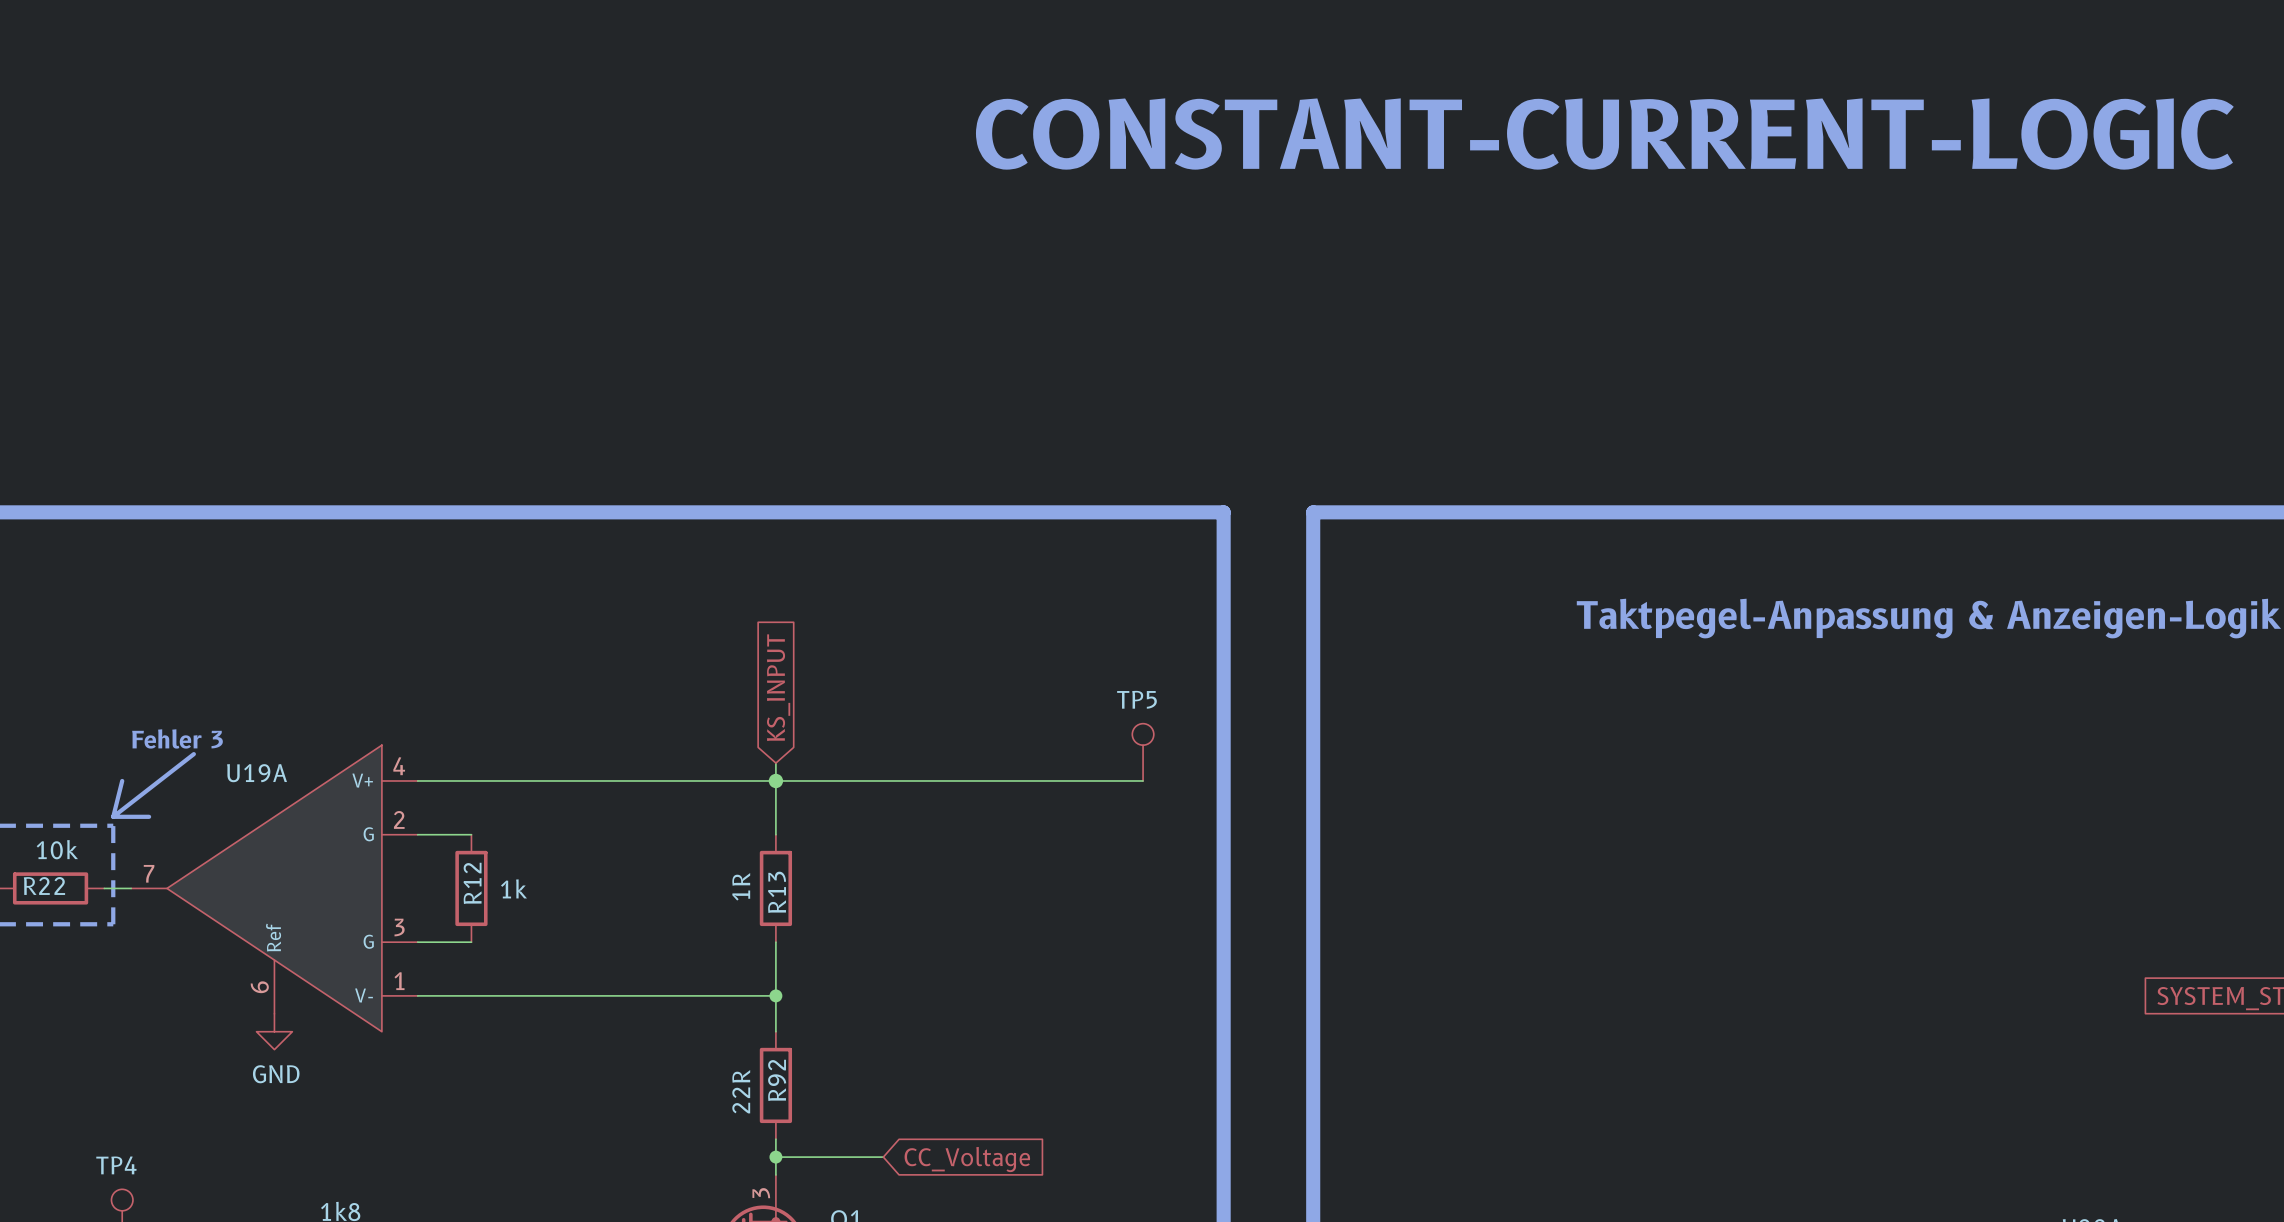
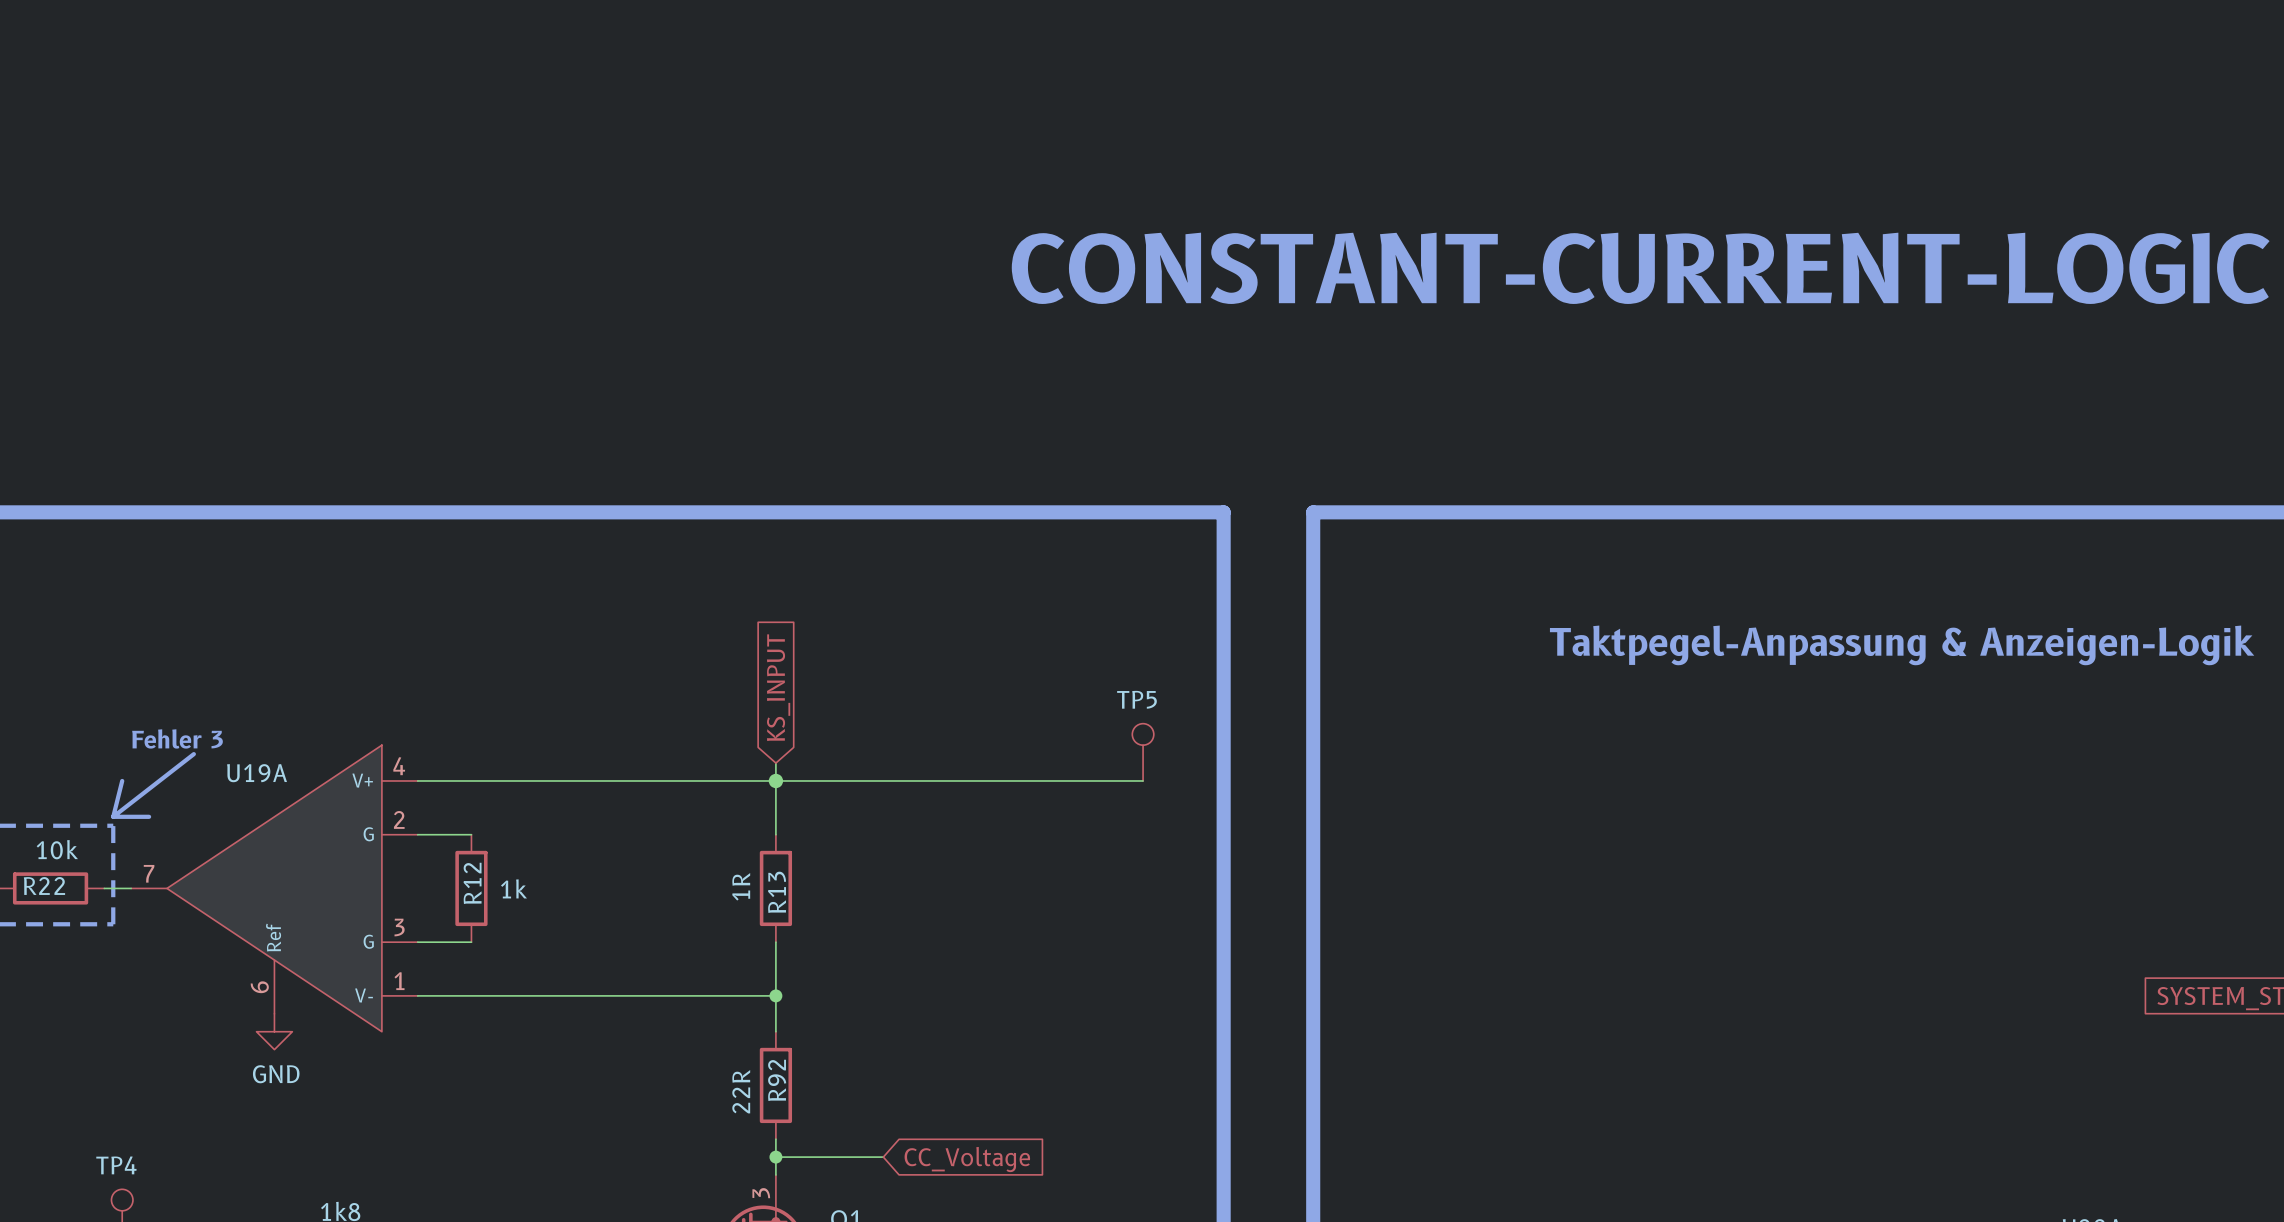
text position: CONSTANT-CURRENT-LOGIC (1604, 134) -> CONSTANT-CURRENT-LOGIC (1640, 268)
text position: Taktpegel-Anpassung & Anzeigen-Logik (1928, 618) -> Taktpegel-Anpassung & Anzeigen-Logik (1902, 645)

